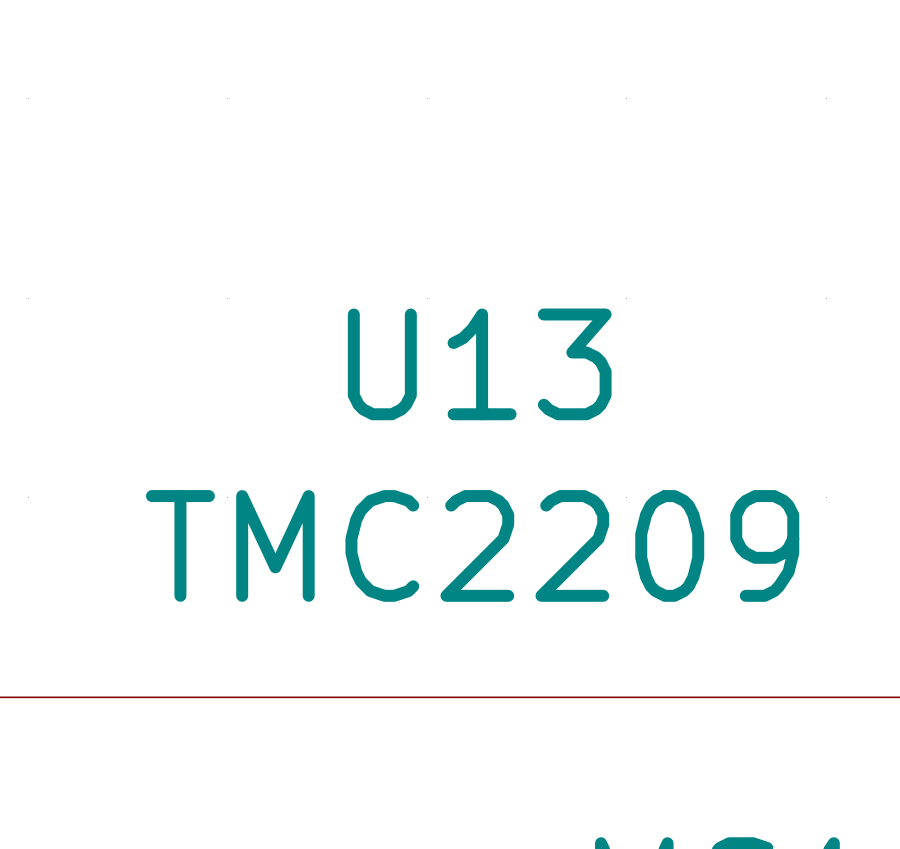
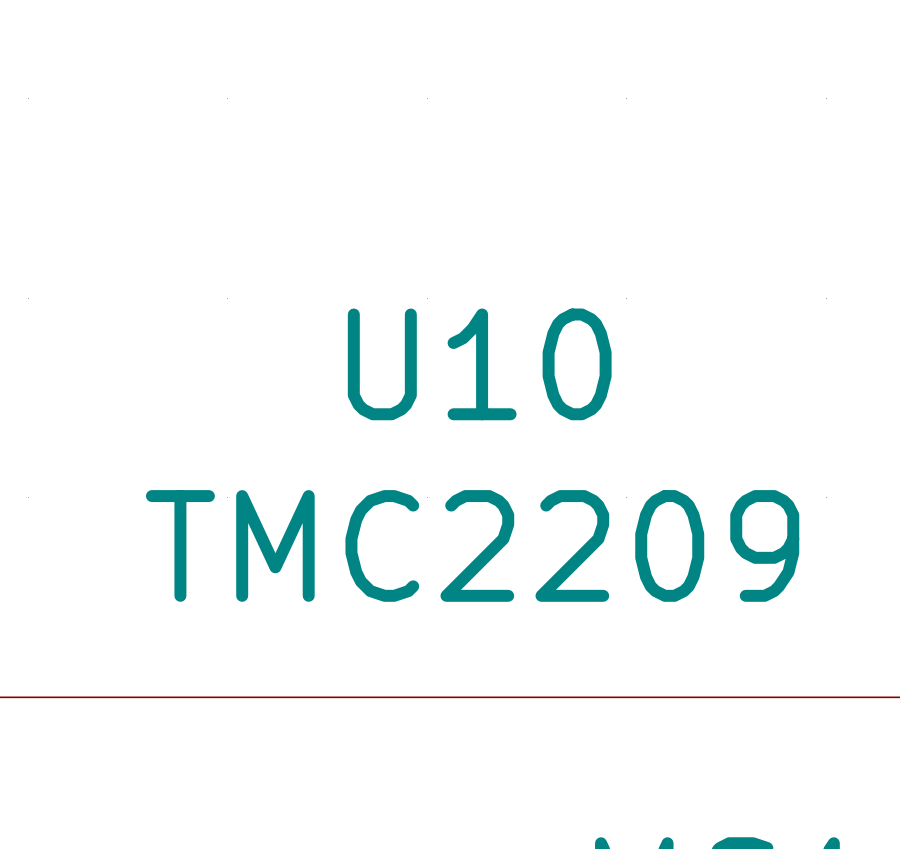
U13 name: U13 (479, 364) -> U10 (479, 364)

